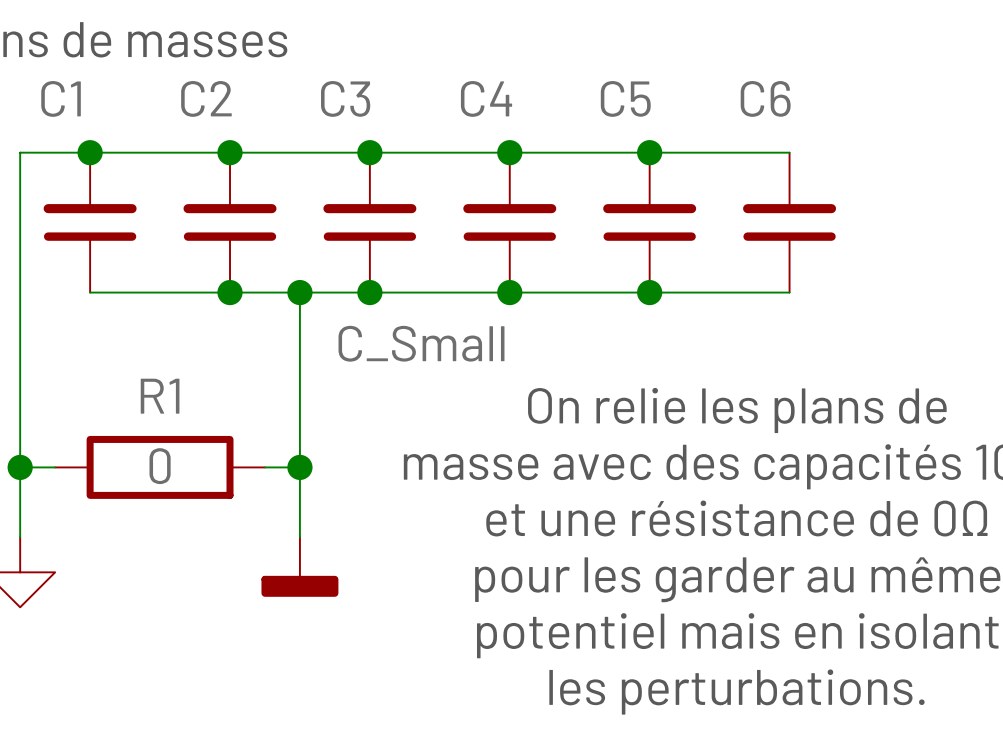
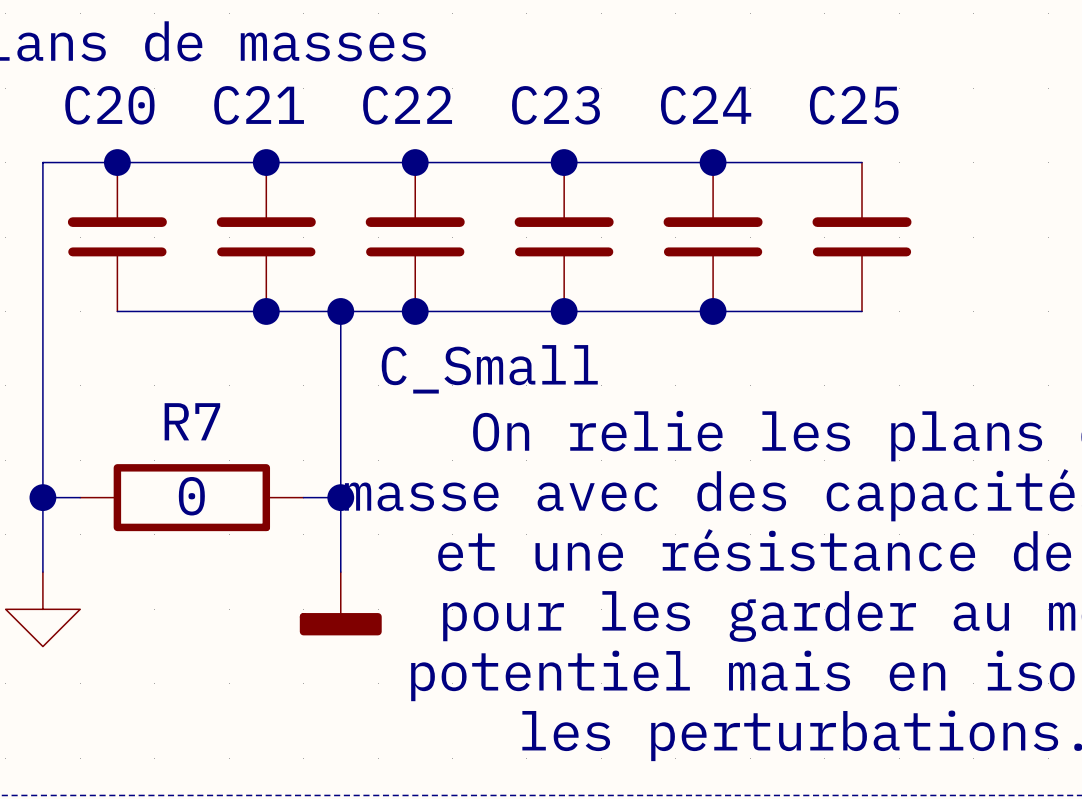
C1 name: C1 (61, 98) -> C20 (109, 105)
C2 name: C2 (206, 98) -> C21 (259, 105)
C3 name: C3 (345, 98) -> C22 (407, 105)
C4 name: C4 (486, 98) -> C23 (555, 105)
C5 name: C5 (625, 98) -> C24 (706, 105)
C6 name: C6 (765, 98) -> C25 (854, 105)
R1 name: R1 (160, 396) -> R7 (192, 421)

